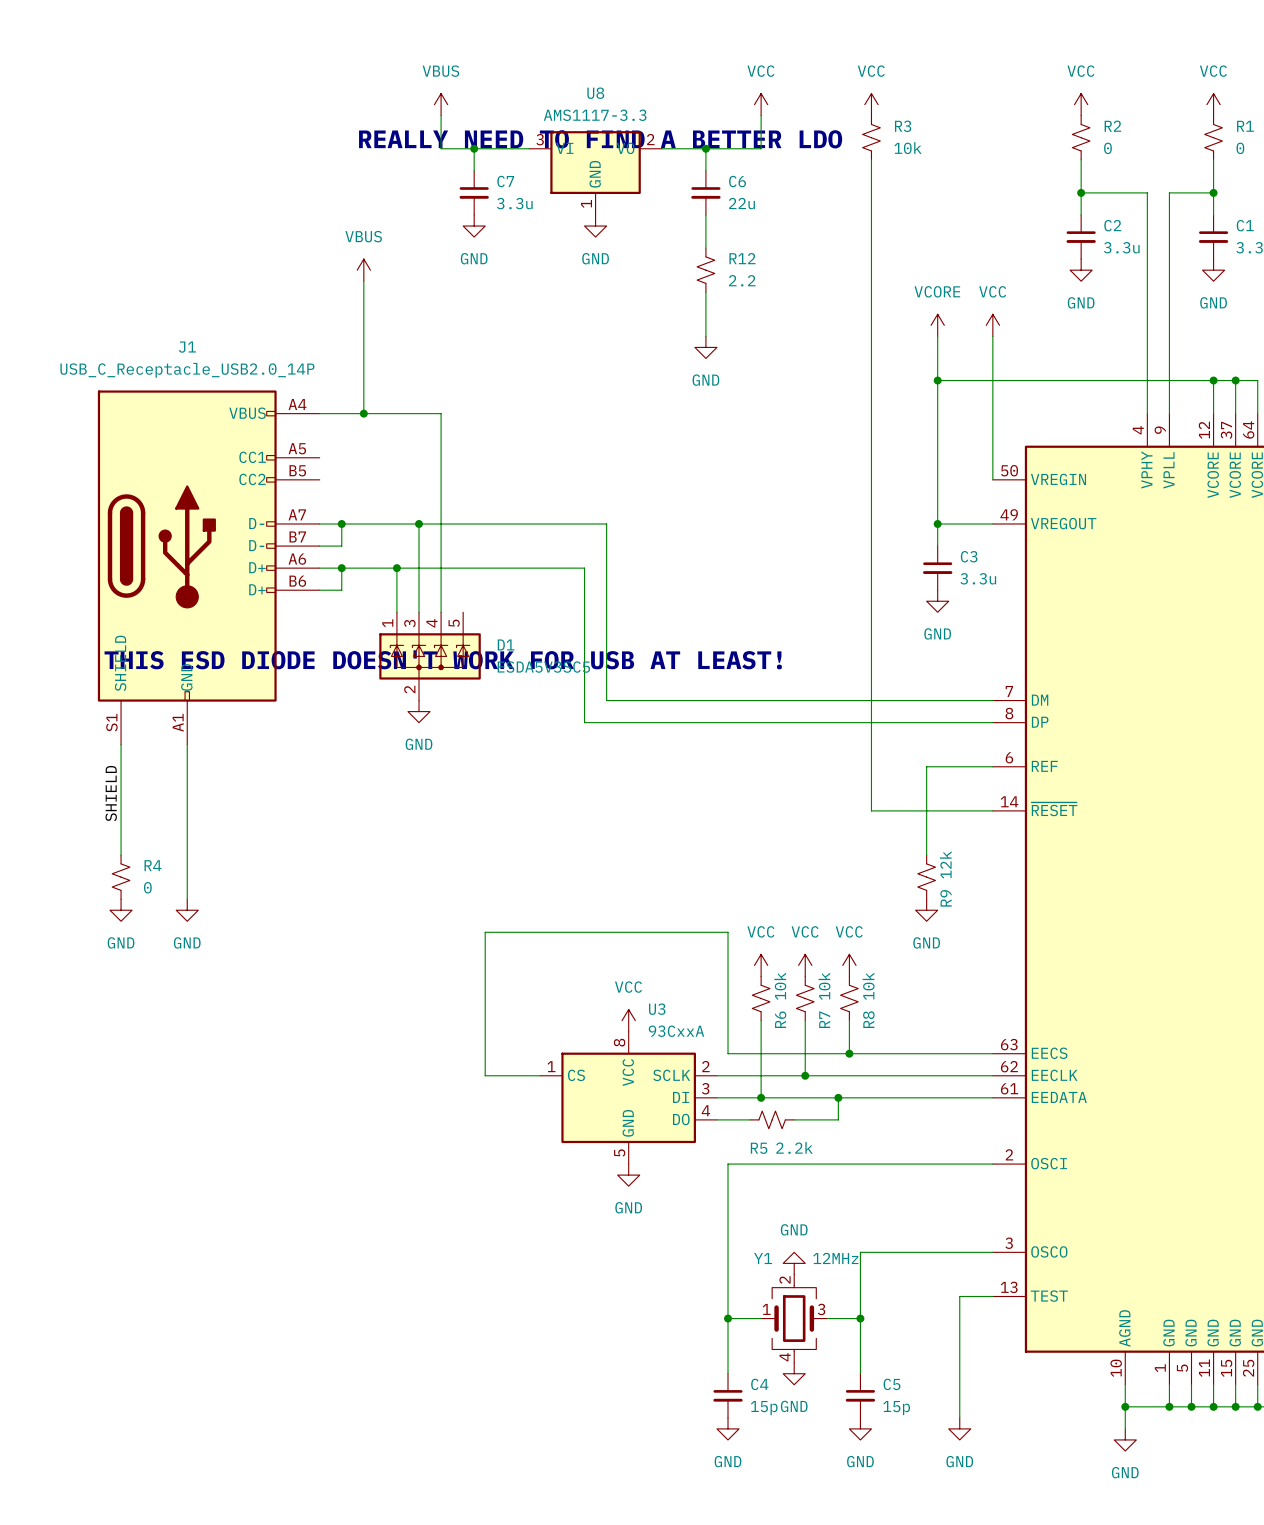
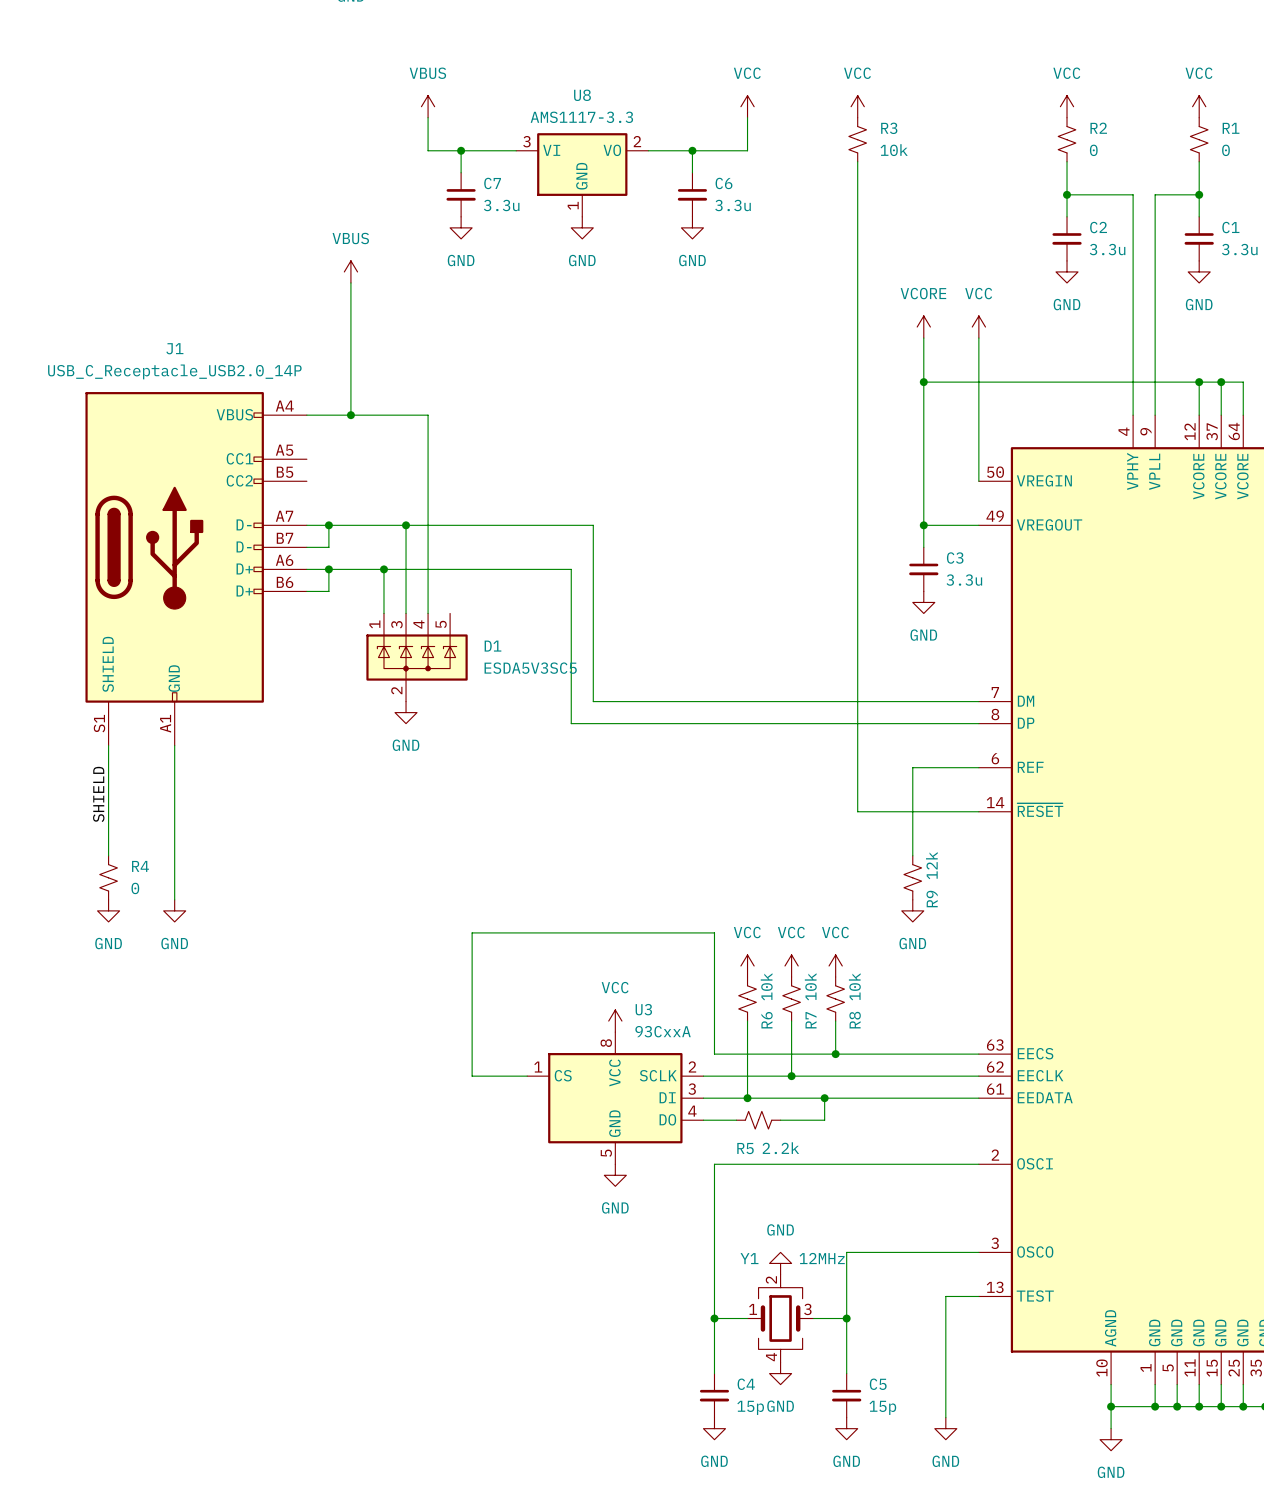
text: REALLY NEED TO FIND A BETTER LDO (600, 139) -> none
C6 value: 22u (741, 203) -> 3.3u (733, 205)
wire: (705, 214) (705, 248) -> none
R12: 2.2 (705, 270) -> none
wire: (705, 292) (705, 336) -> none
power symbol position: GND (705, 347) -> GND (692, 227)
text: THIS ESD DIODE DOESN'T WORK FOR USB AT LEAST! (443, 659) -> none

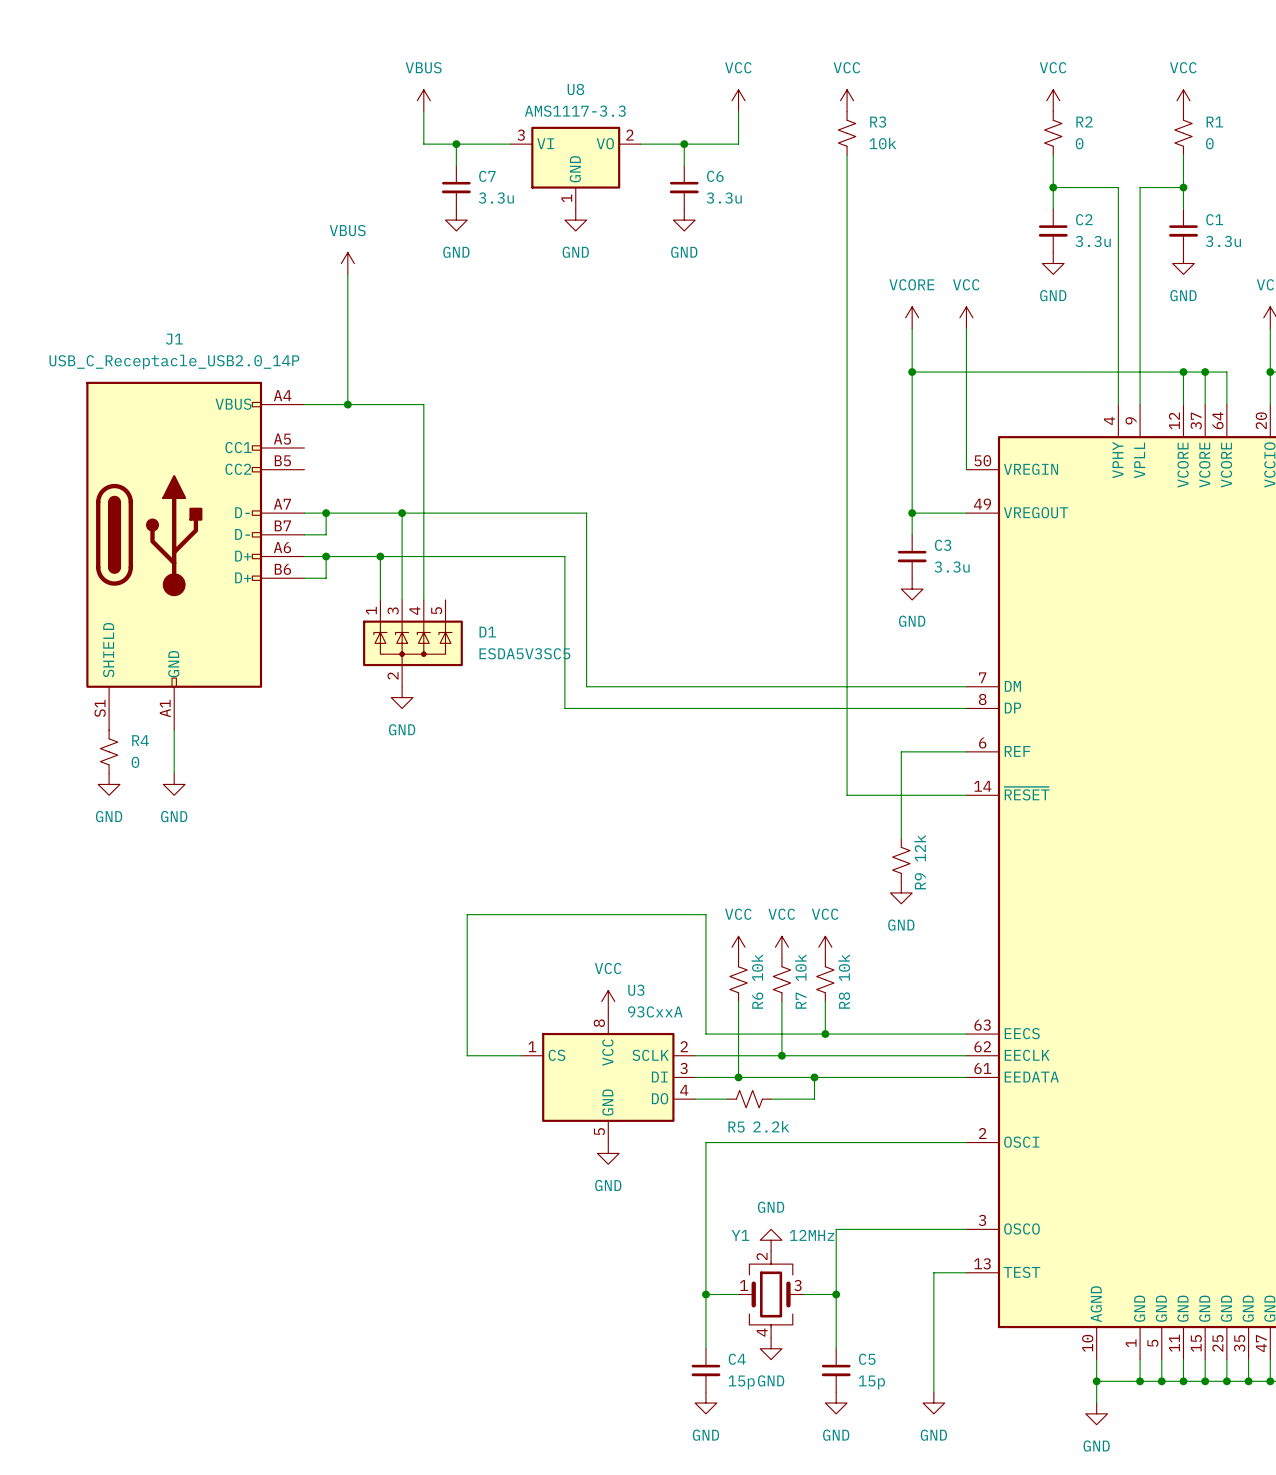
wire: (108, 745) (108, 855) -> none
wire: (174, 789) (174, 899) -> none
label: SHIELD (98, 794) -> none
power symbol: none -> GND (109, 784)
power symbol: none -> GND (174, 784)
R4 position: (108, 877) -> (109, 751)
power symbol: GND (108, 910) -> none
power symbol: GND (174, 910) -> none

